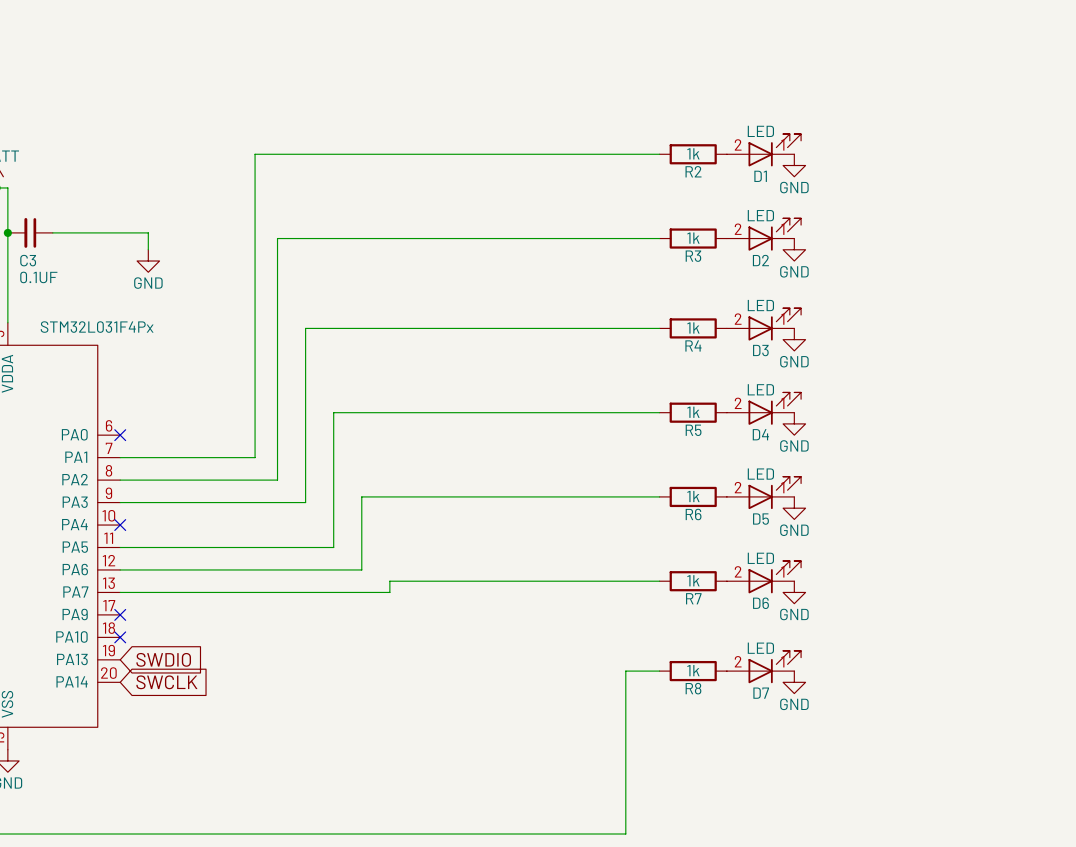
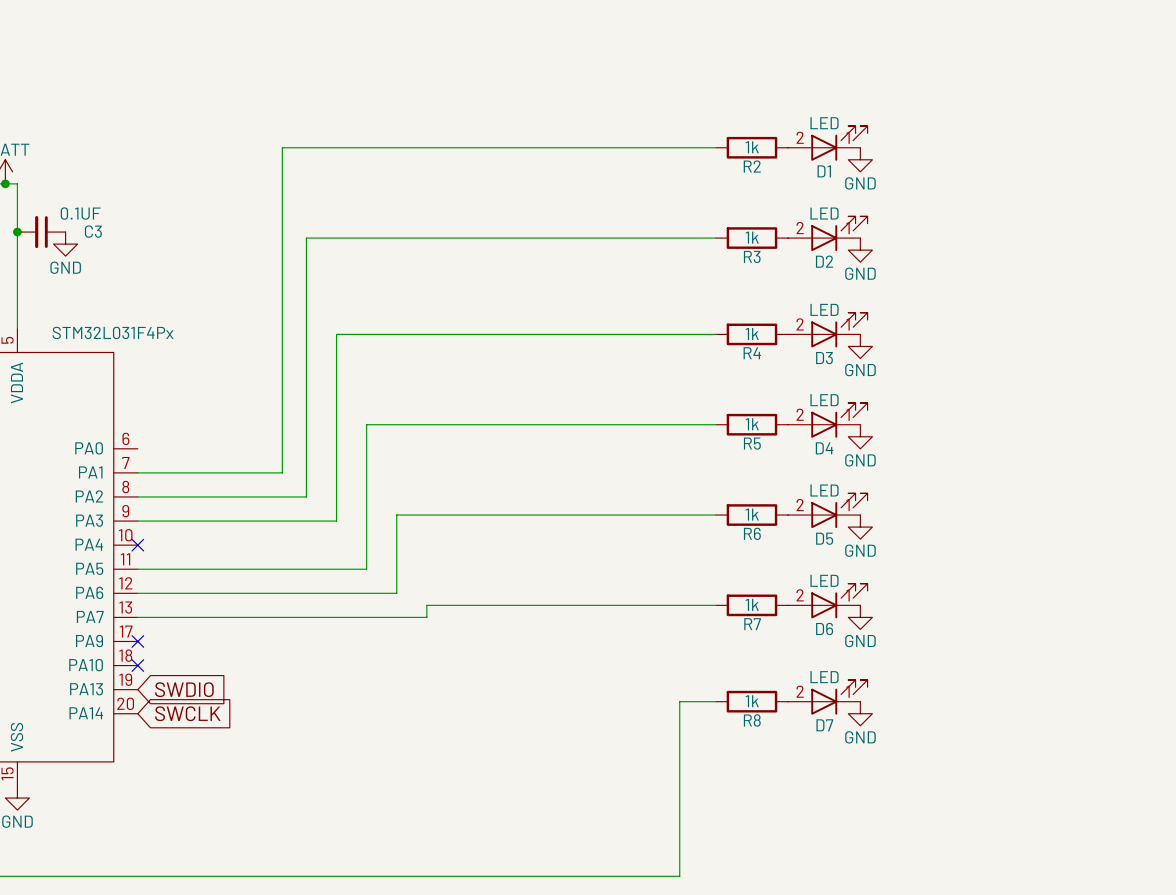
wire: (52, 232) (148, 232) (148, 249) -> none
C3 name position: C3 (28, 260) -> C3 (93, 231)
power symbol position: GND (148, 261) -> GND (65, 244)
C3 value position: 0.1UF (38, 277) -> 0.1UF (80, 213)
no-connect mark: (120, 435) -> none

